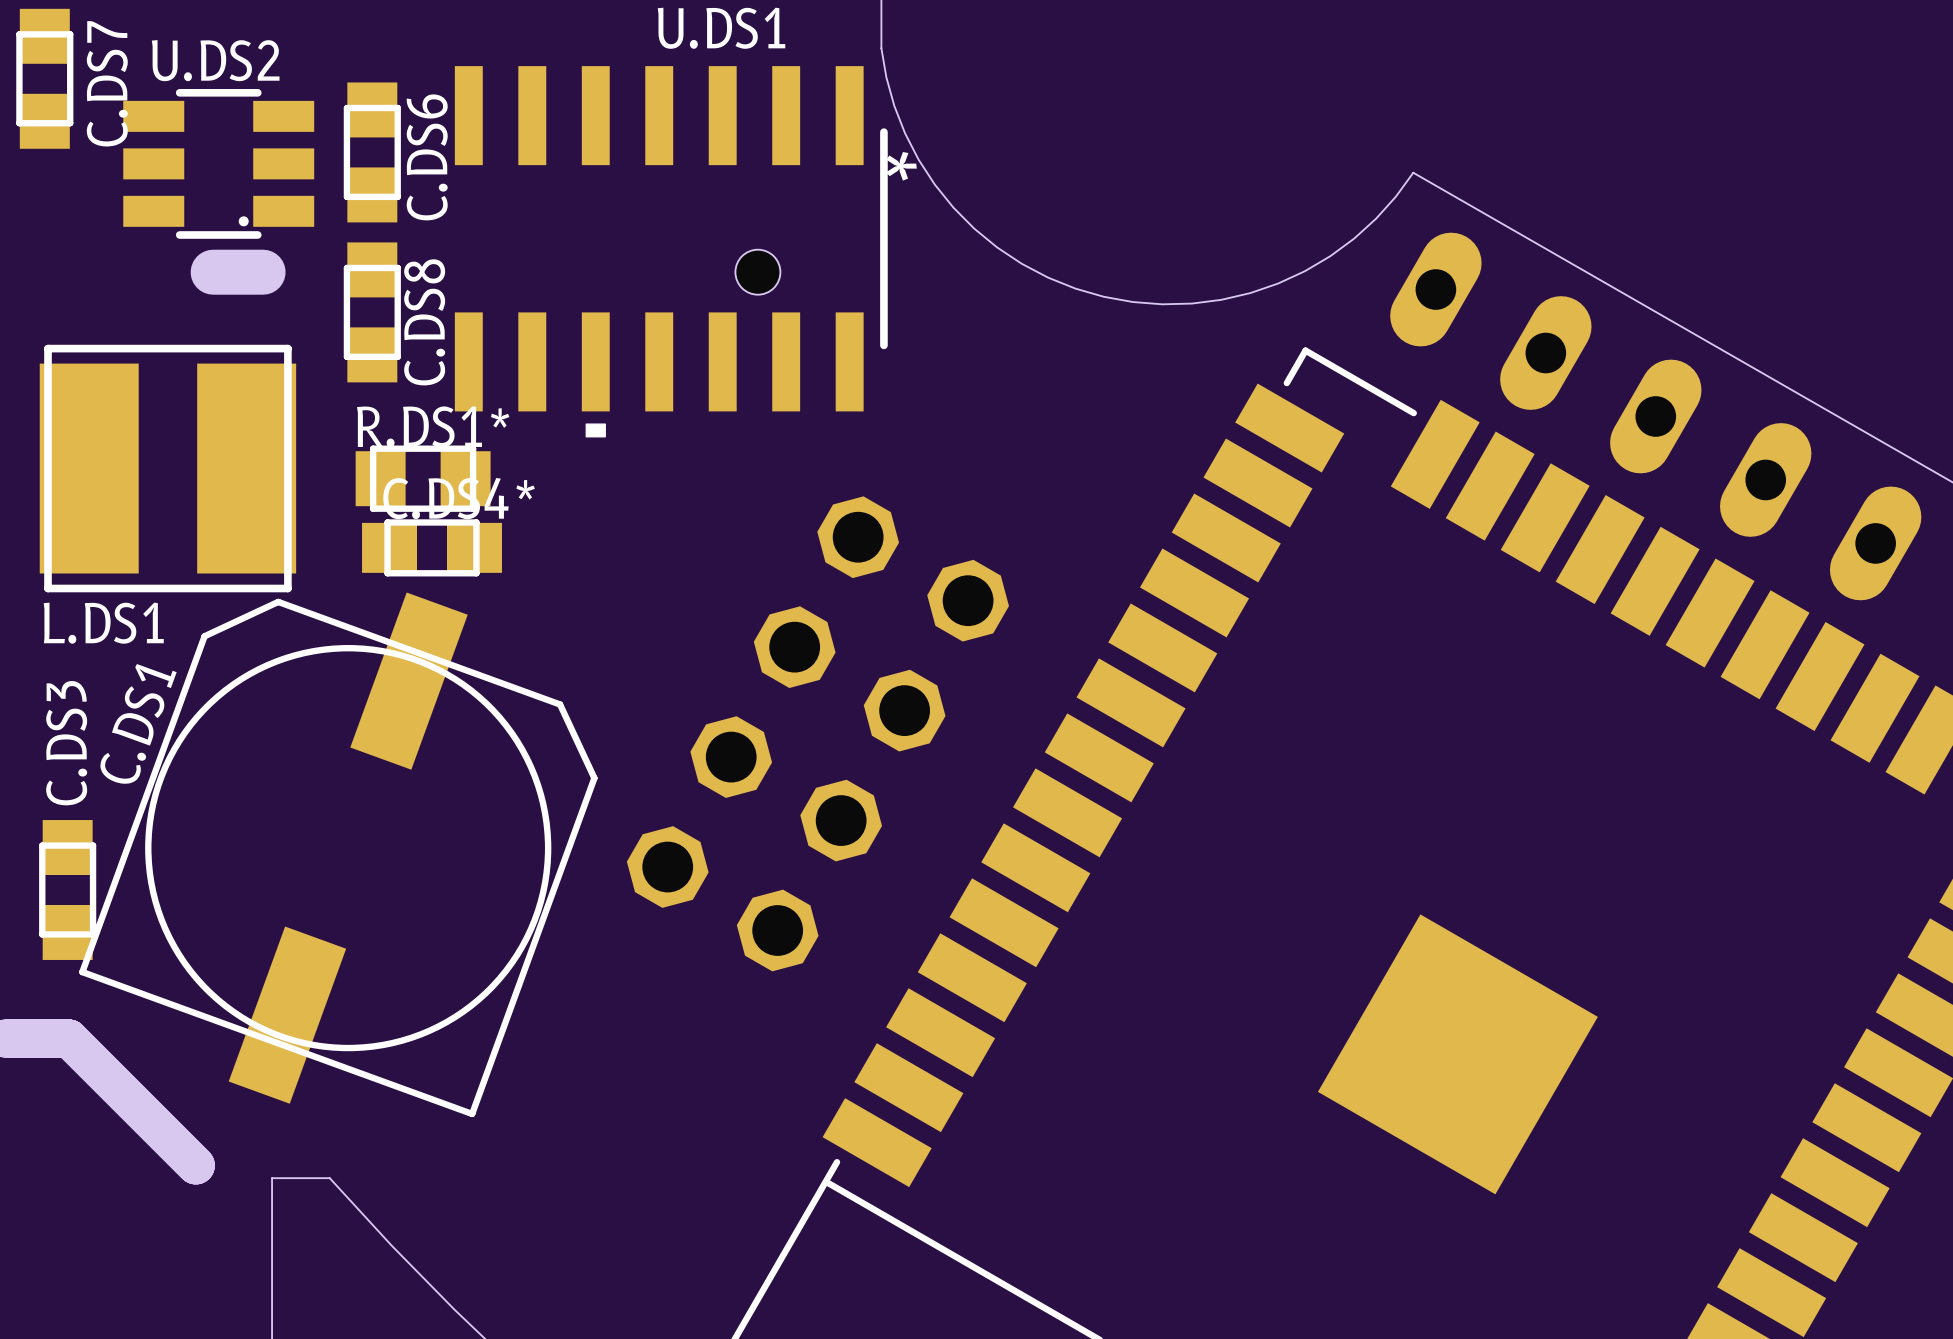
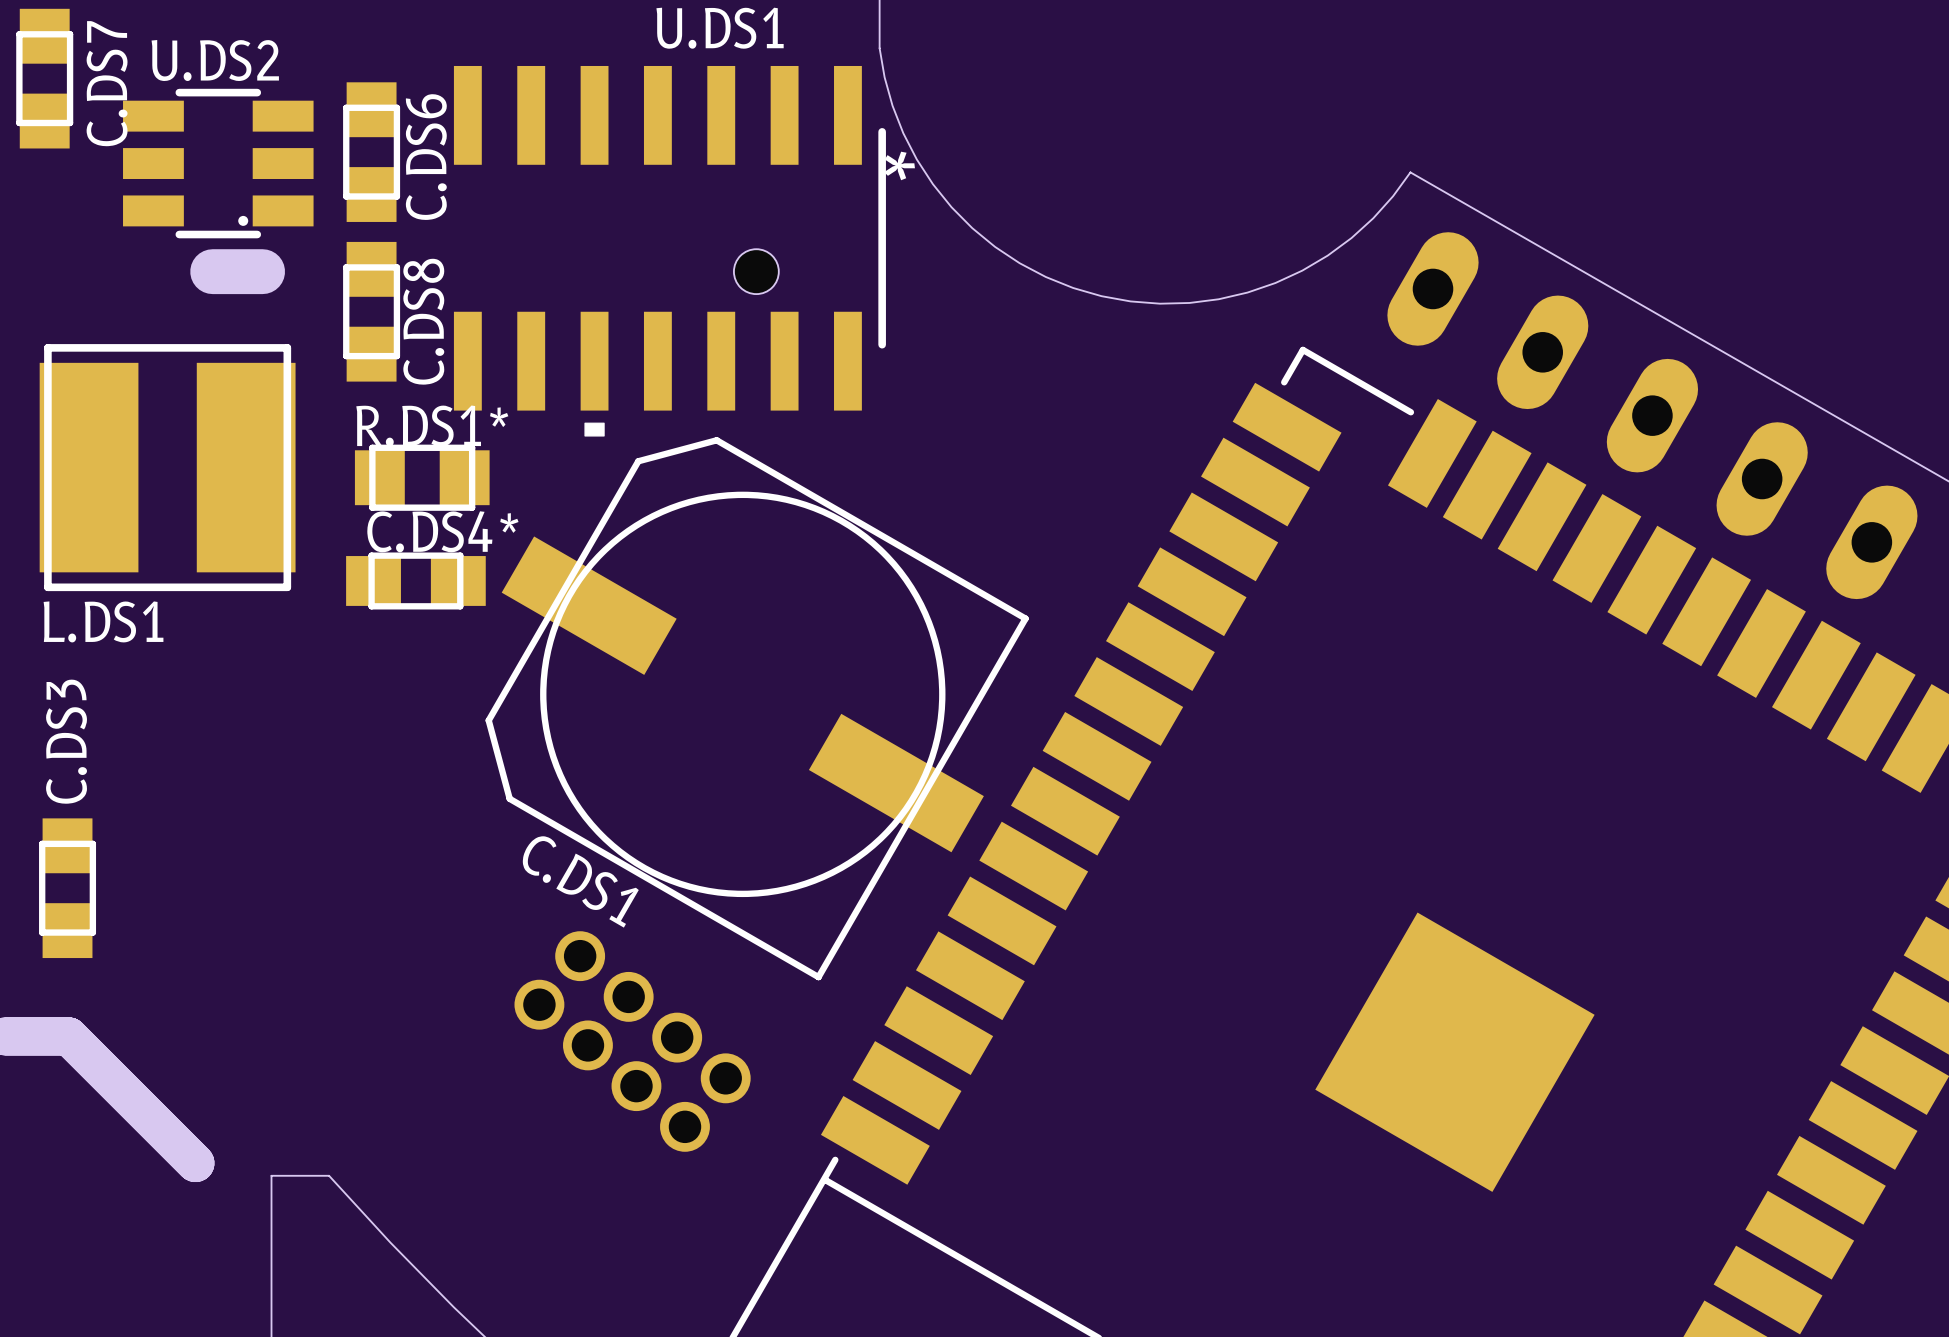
C.DS4* position: (432, 547) -> (415, 580)
part: (817, 733) -> none
C.DS1 rotation: 0° (338, 854) -> 80° counterclockwise (757, 708)
C.DS1 position: (338, 854) -> (757, 708)
part: none -> (632, 1041)

